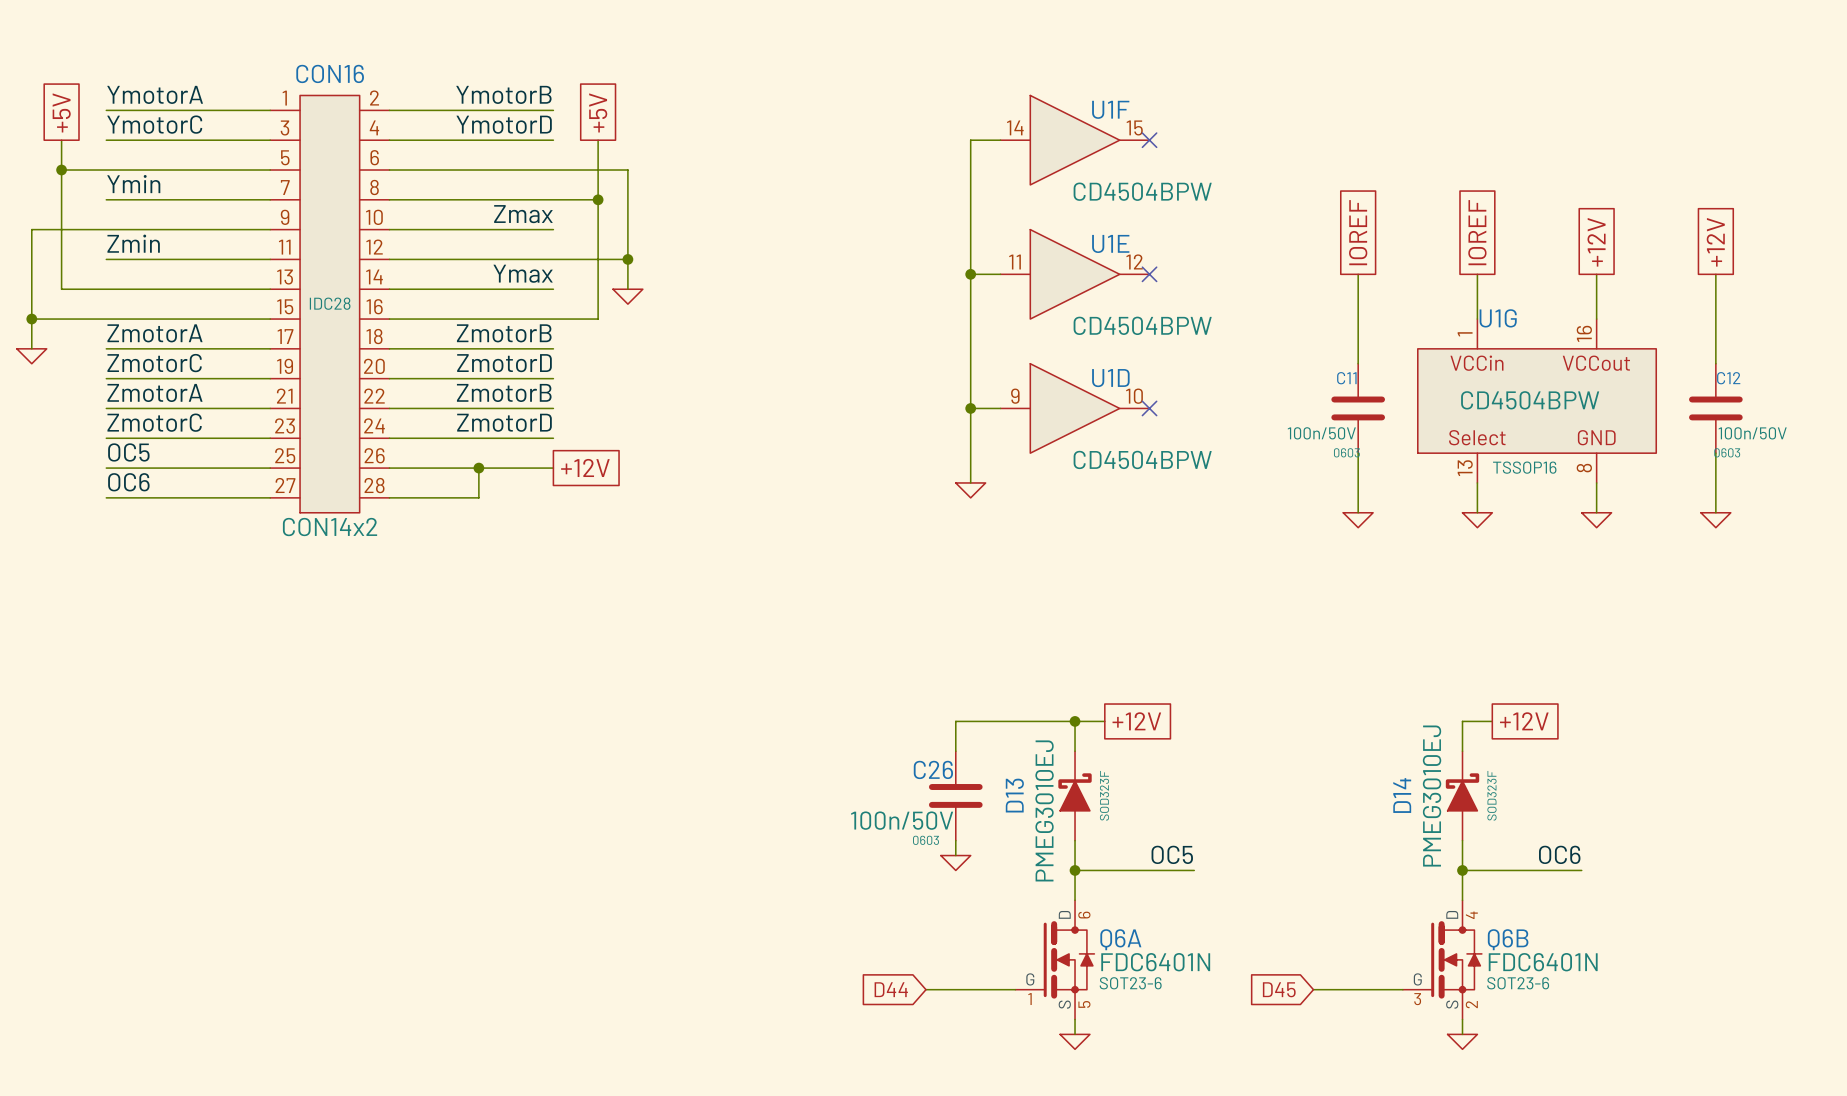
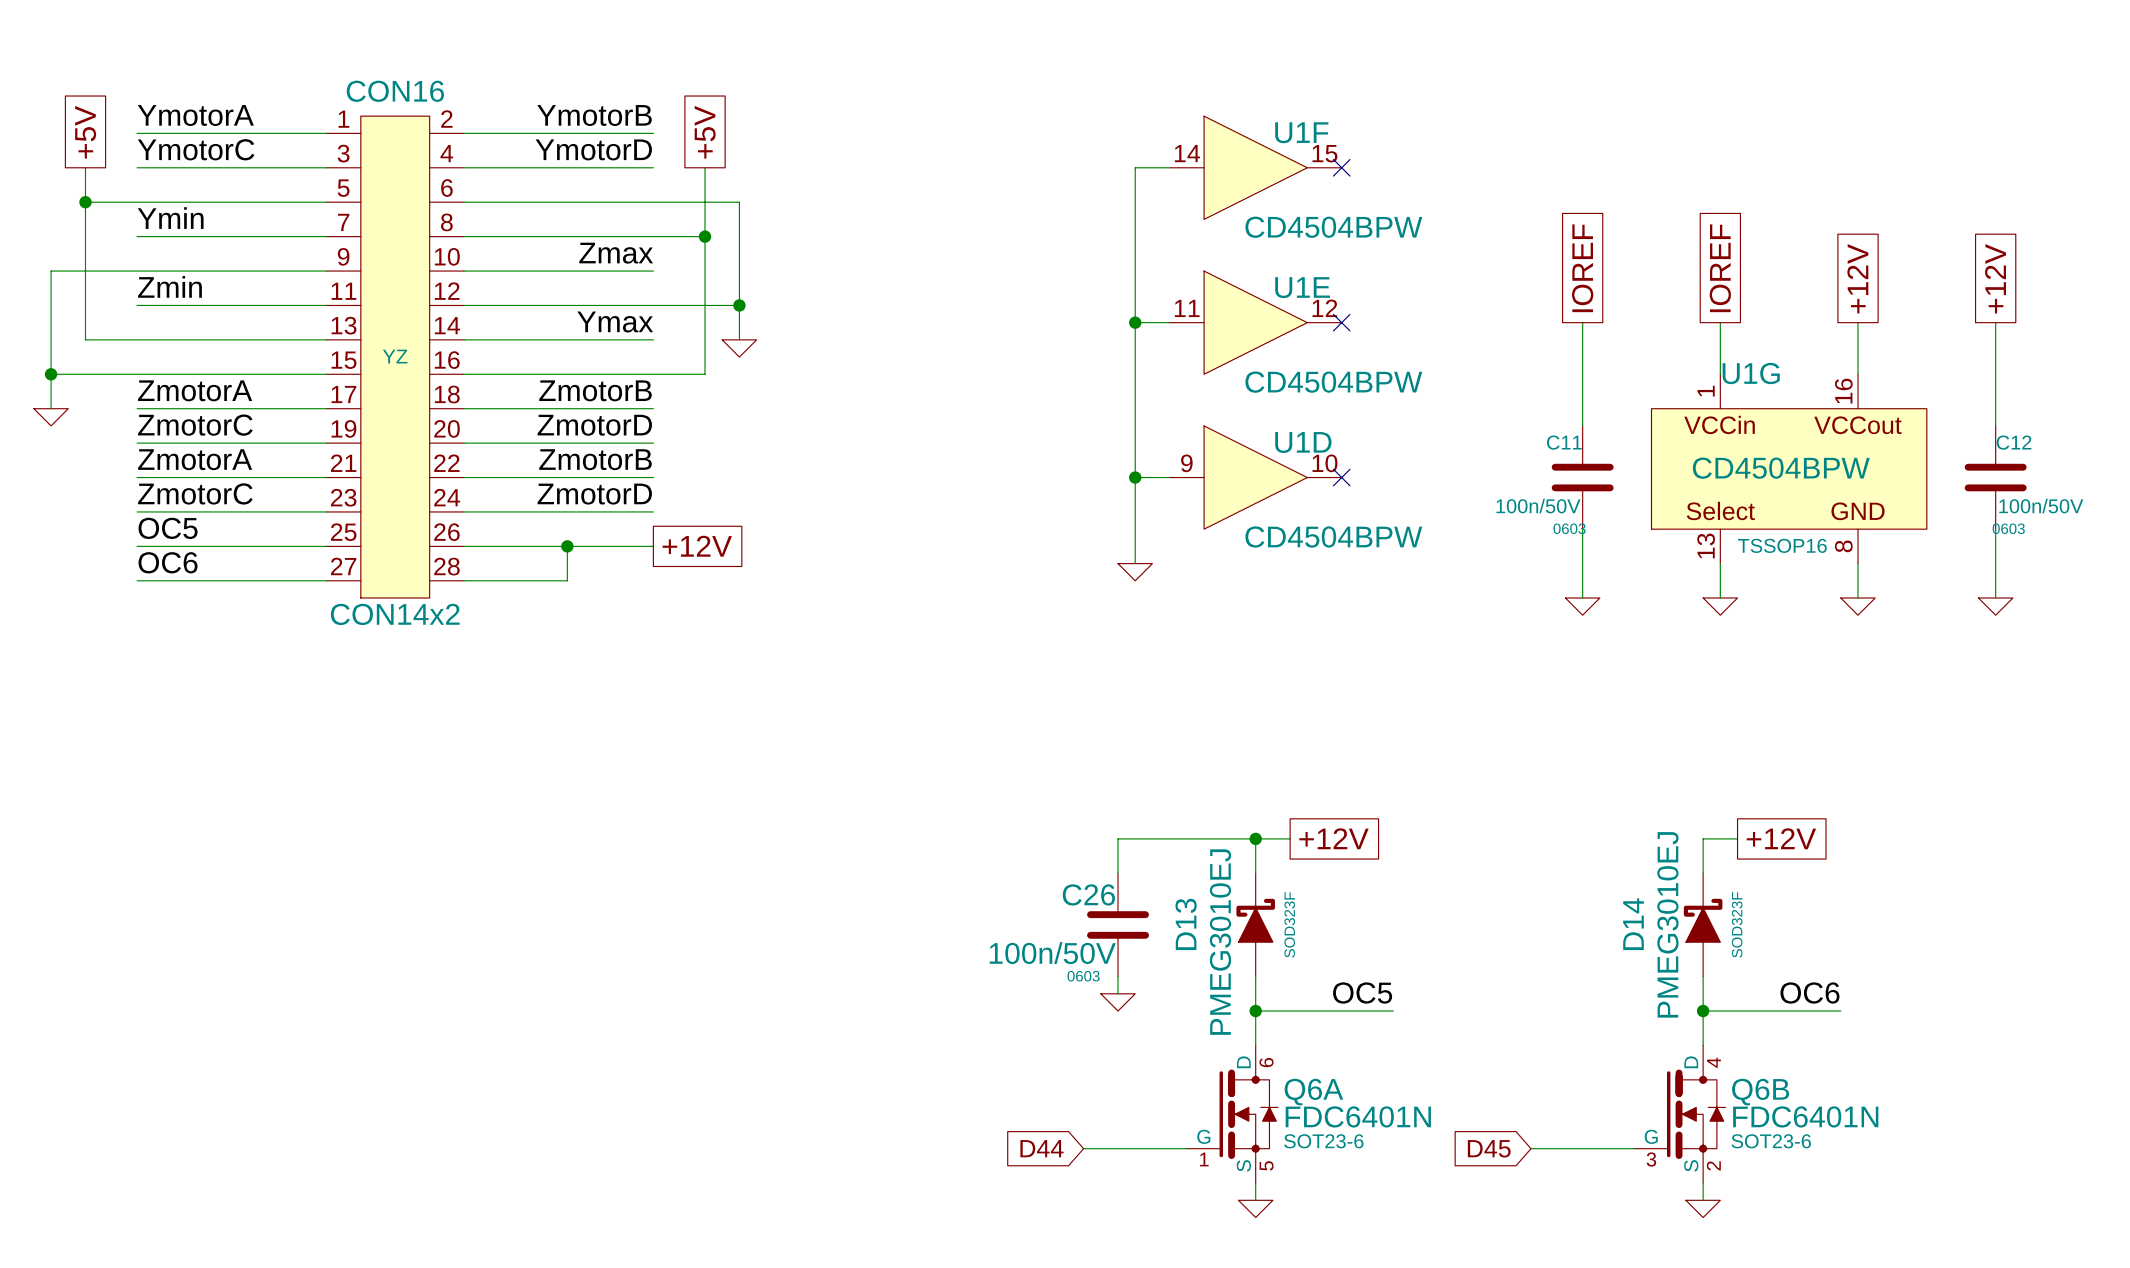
CON16 text: IDC28 (330, 303) -> YZ (395, 356)

